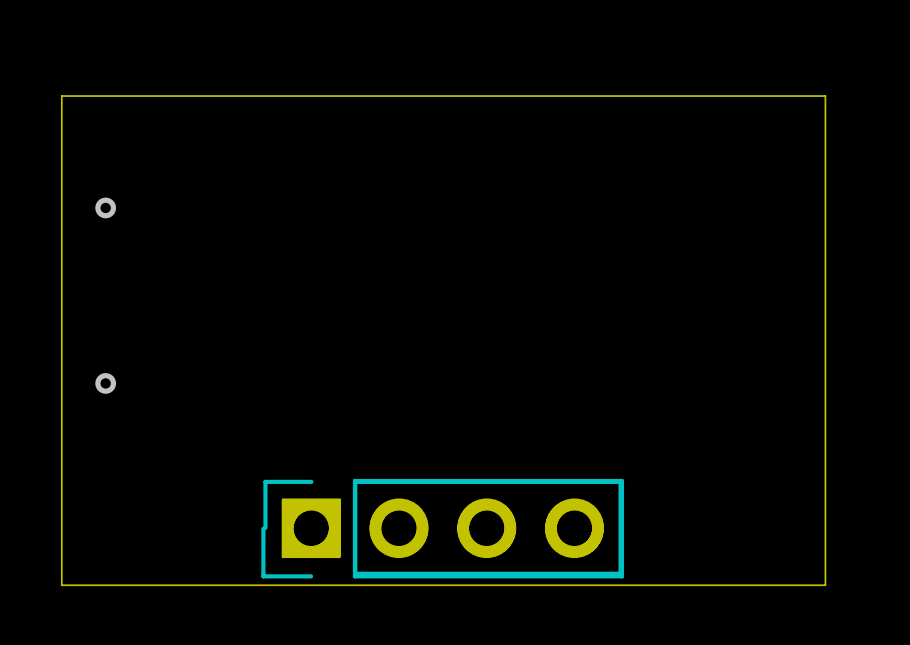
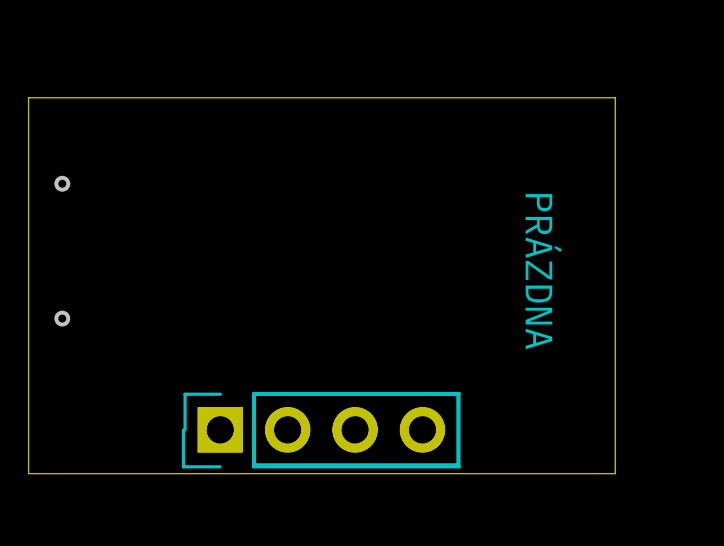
text: none -> PRÁZDNA (543, 271)

